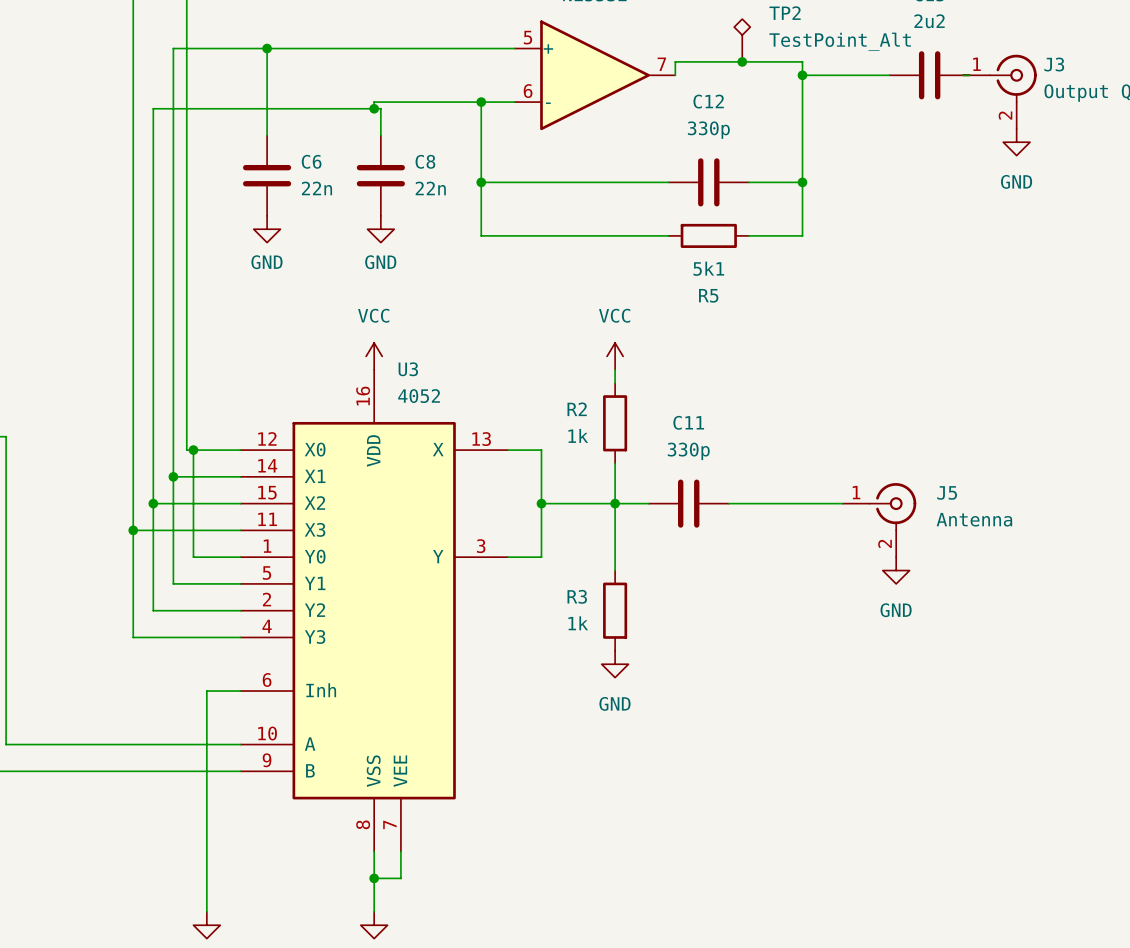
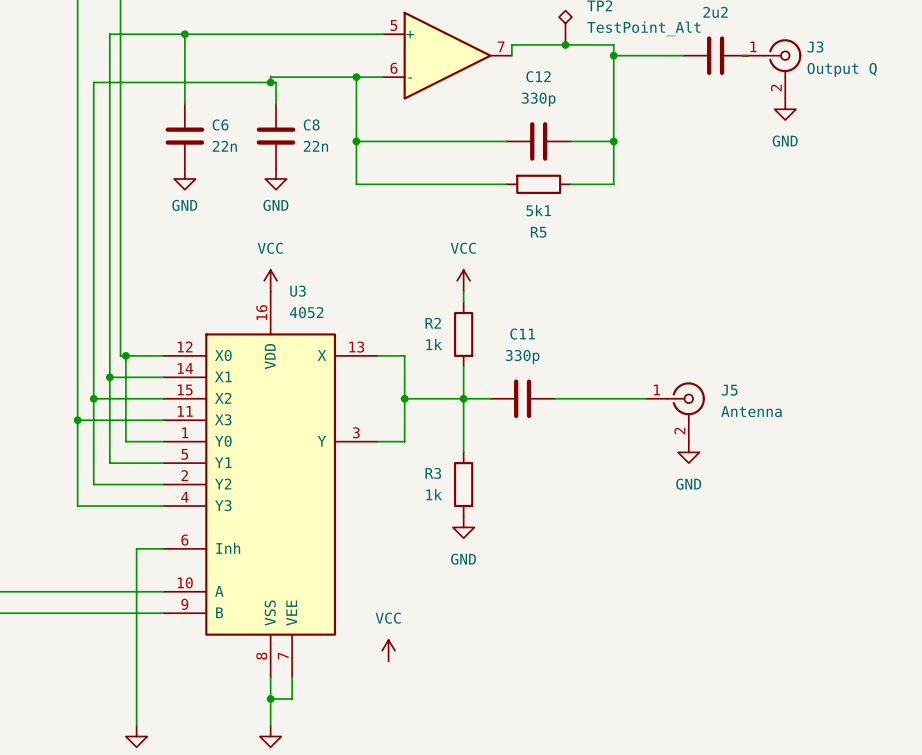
power symbol: none -> VCC (388, 650)

